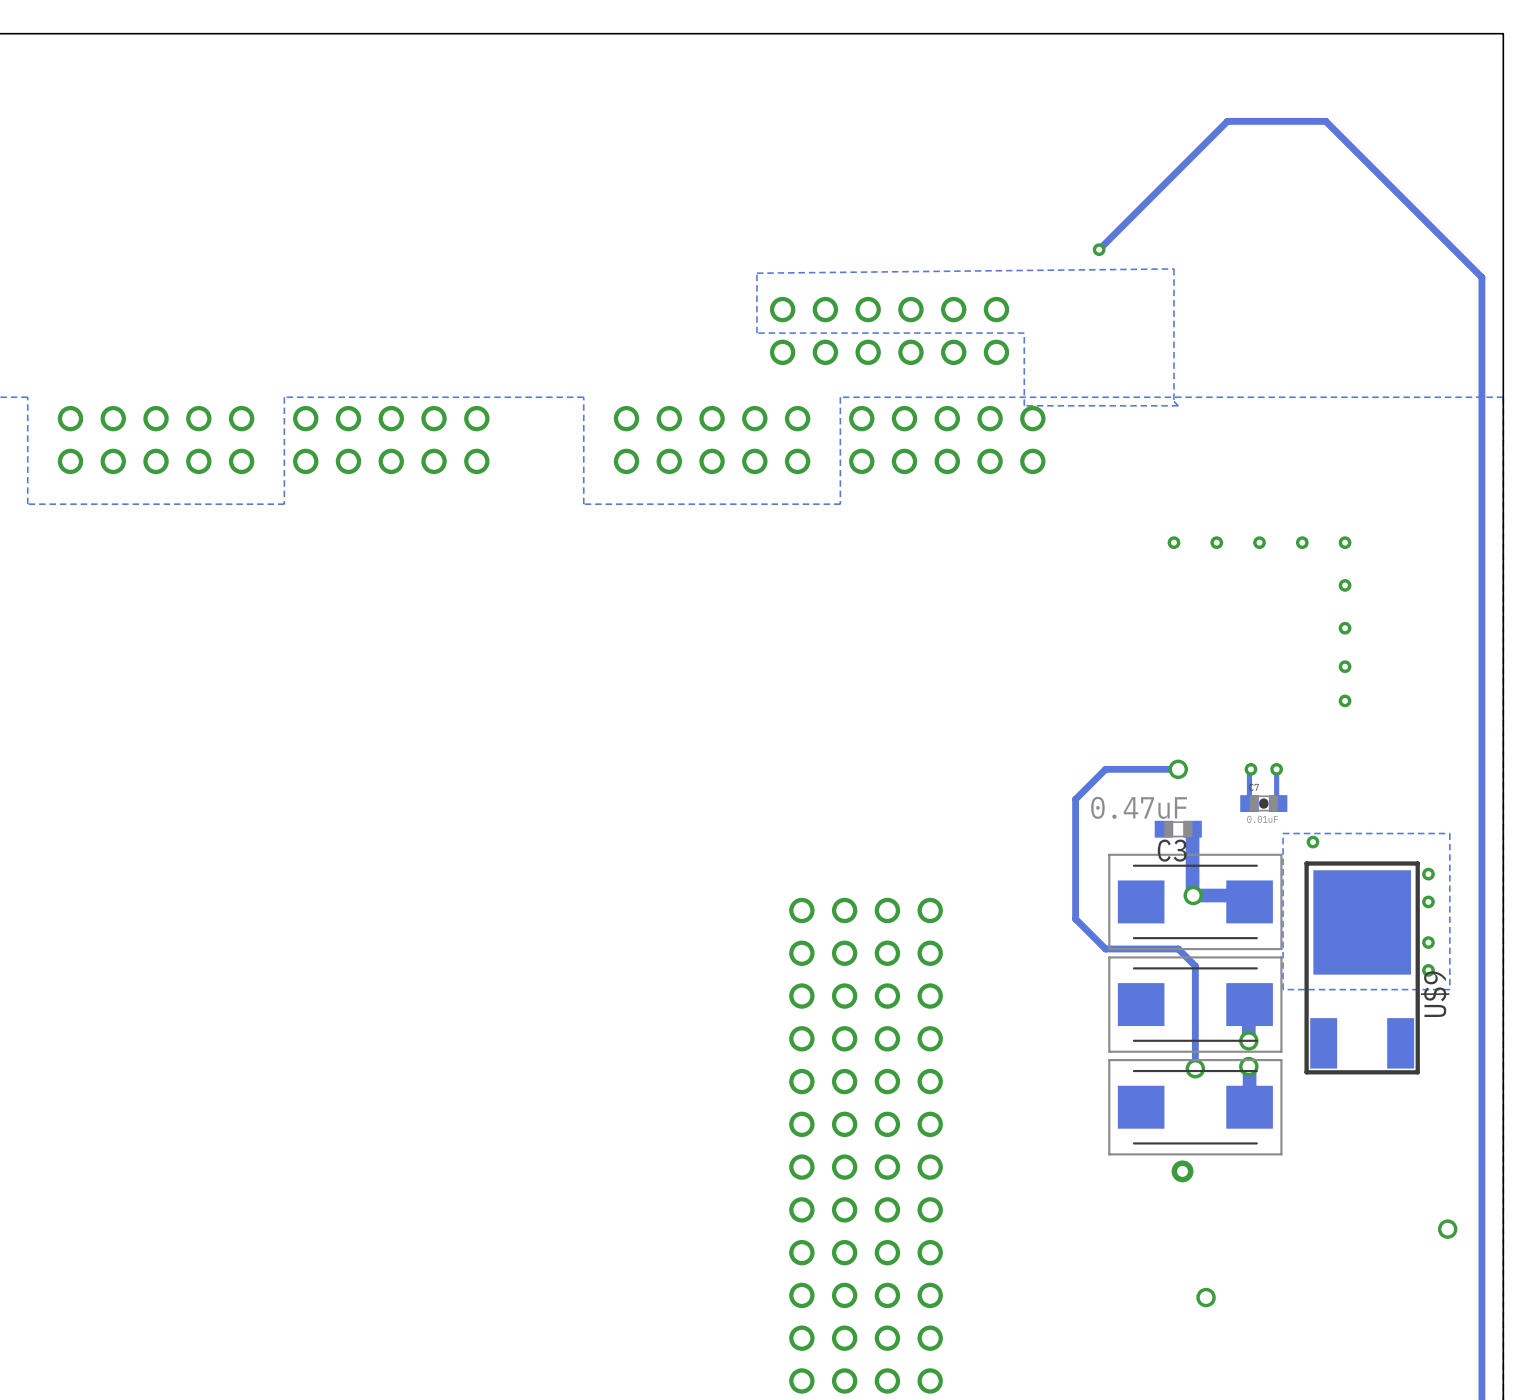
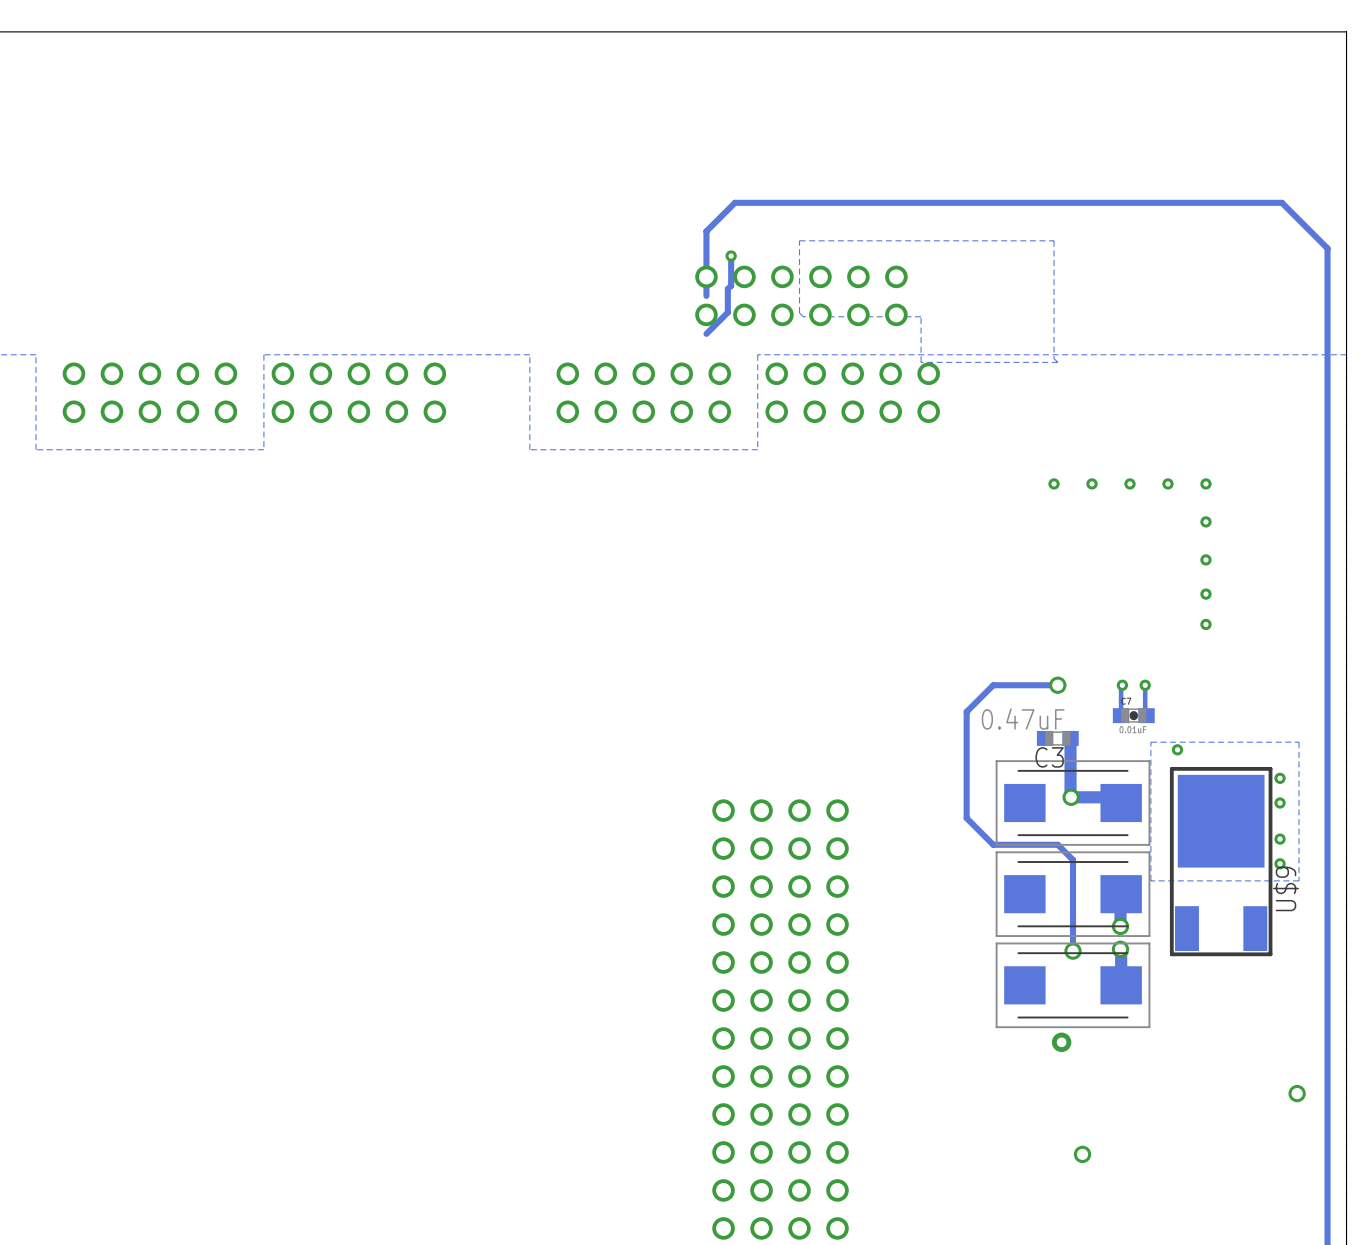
track: (1430, 226) (1325, 121) (1227, 121) (1099, 249) -> (1281, 202) (734, 202) (706, 231) (706, 295)
via: (1099, 249) -> none
zone outline: (1173, 268) (756, 273) (756, 333) (1024, 333) (1024, 354) -> (1054, 240) (799, 240) (799, 312) (803, 316) (921, 316)
track: none -> (731, 256) (731, 285) (727, 289) (727, 312) (706, 333)
via: none -> (731, 256)

